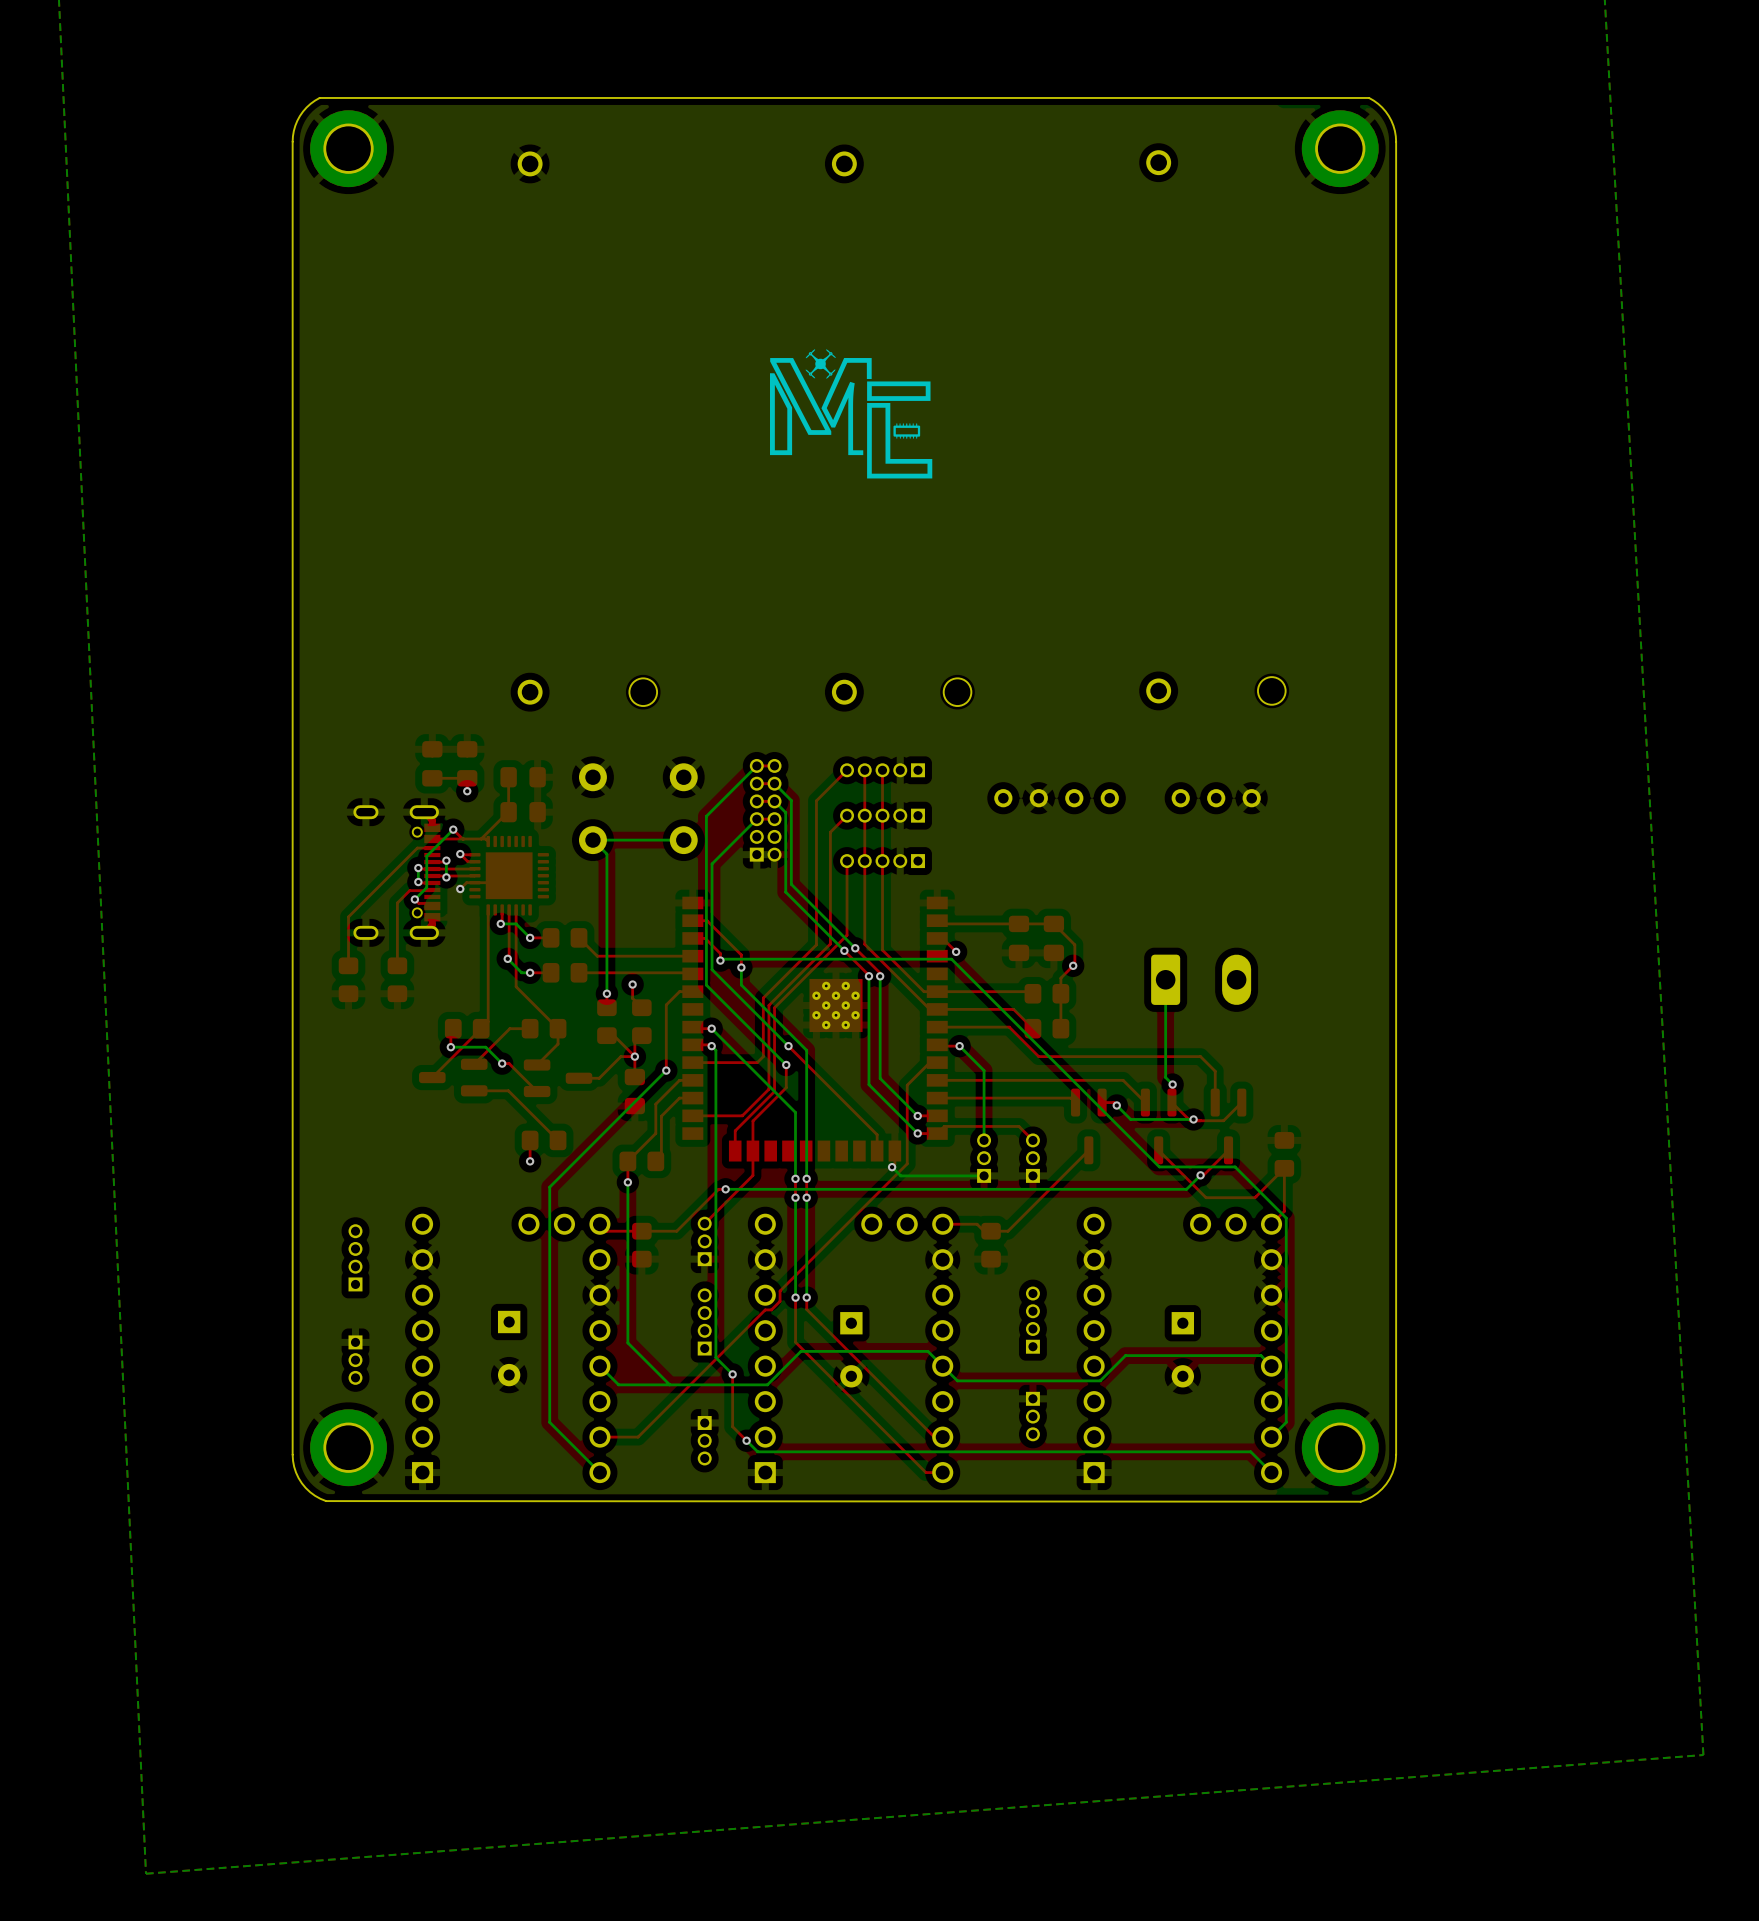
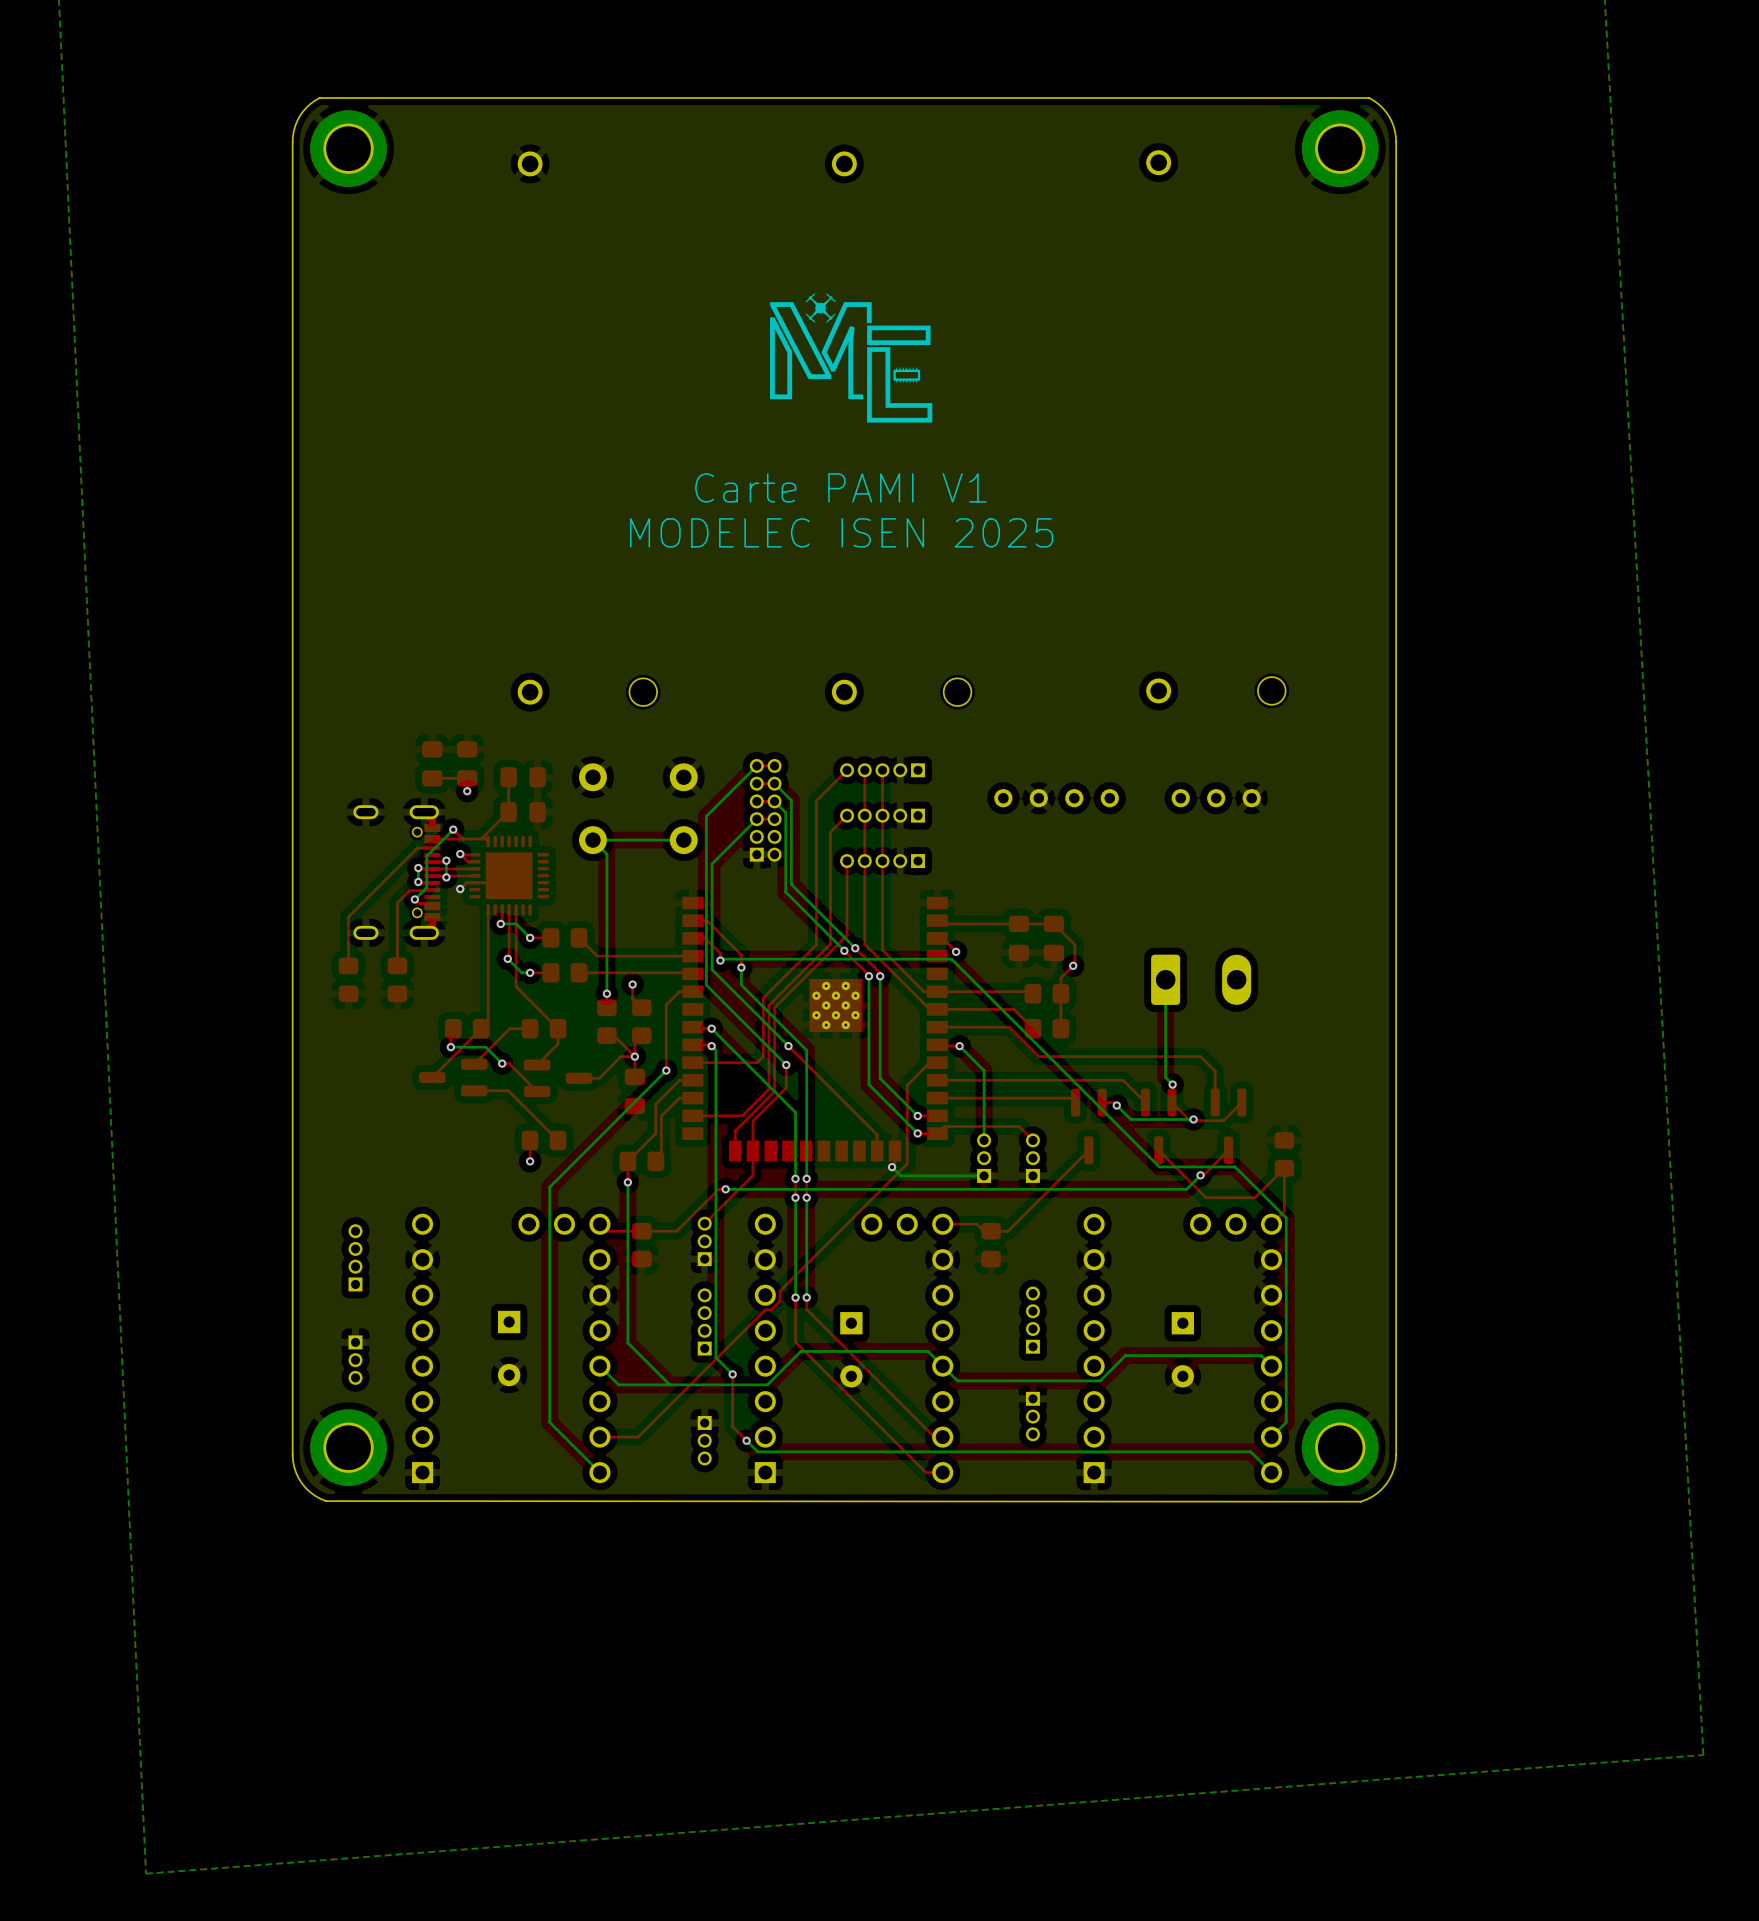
drawing position: (851, 413) -> (851, 358)
text: none -> Carte PAMI V1 (840, 487)
text: none -> MODELEC ISEN 2025 (841, 532)

